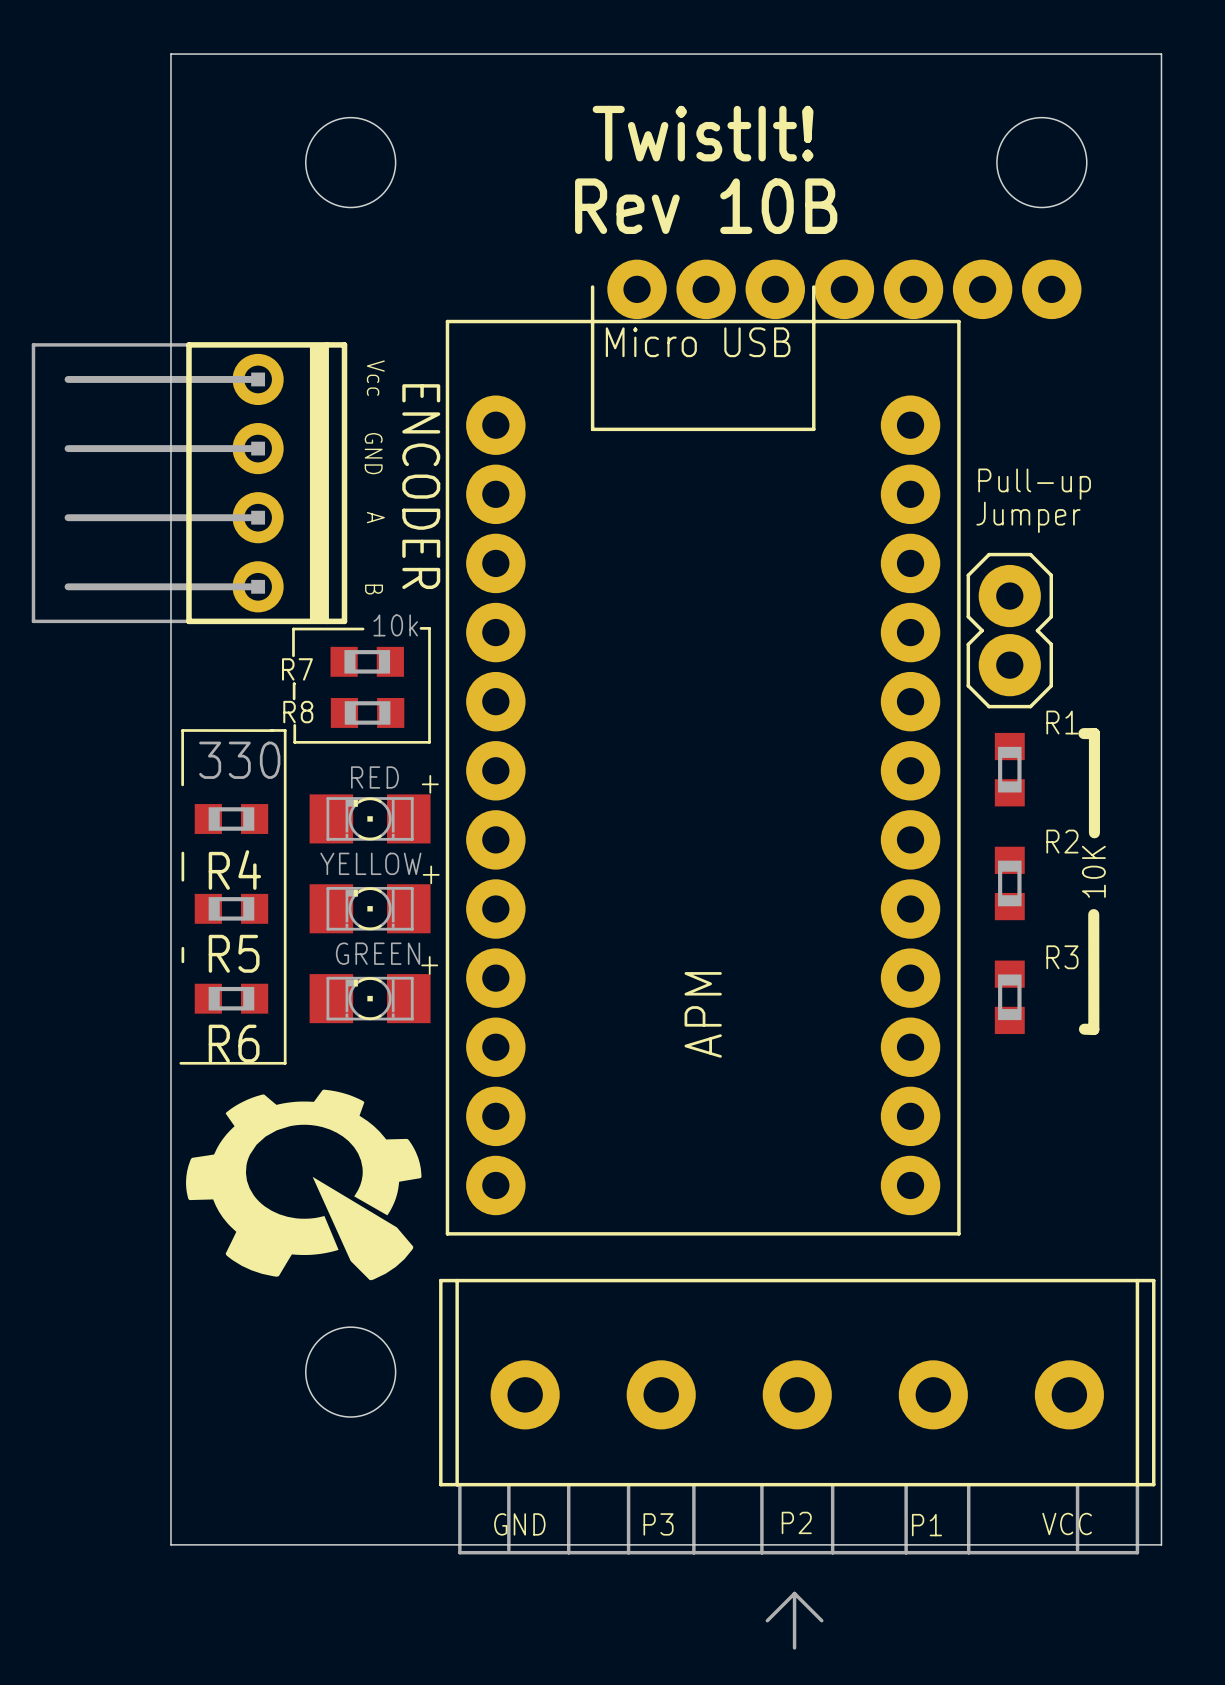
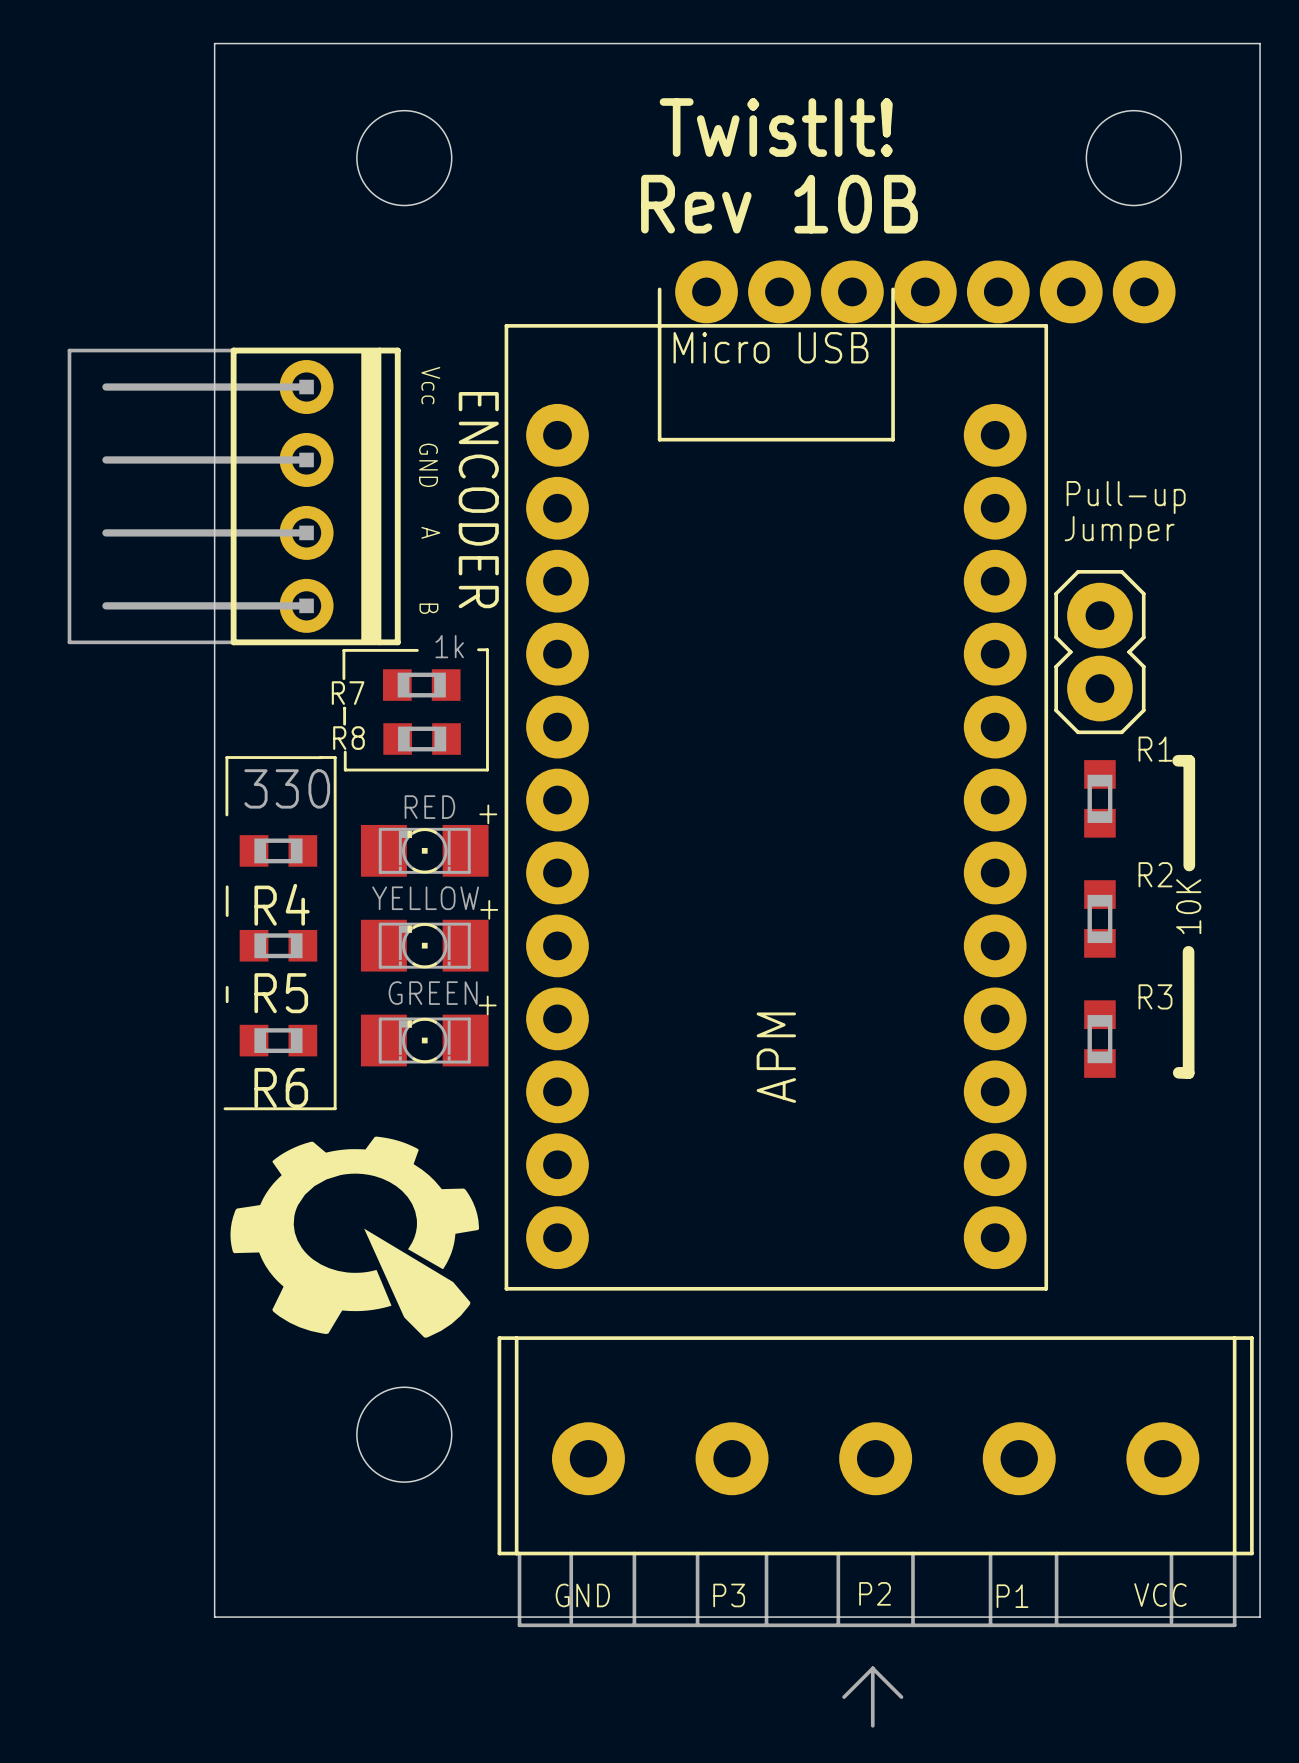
R7 value: 10k (395, 625) -> 1k (449, 646)

